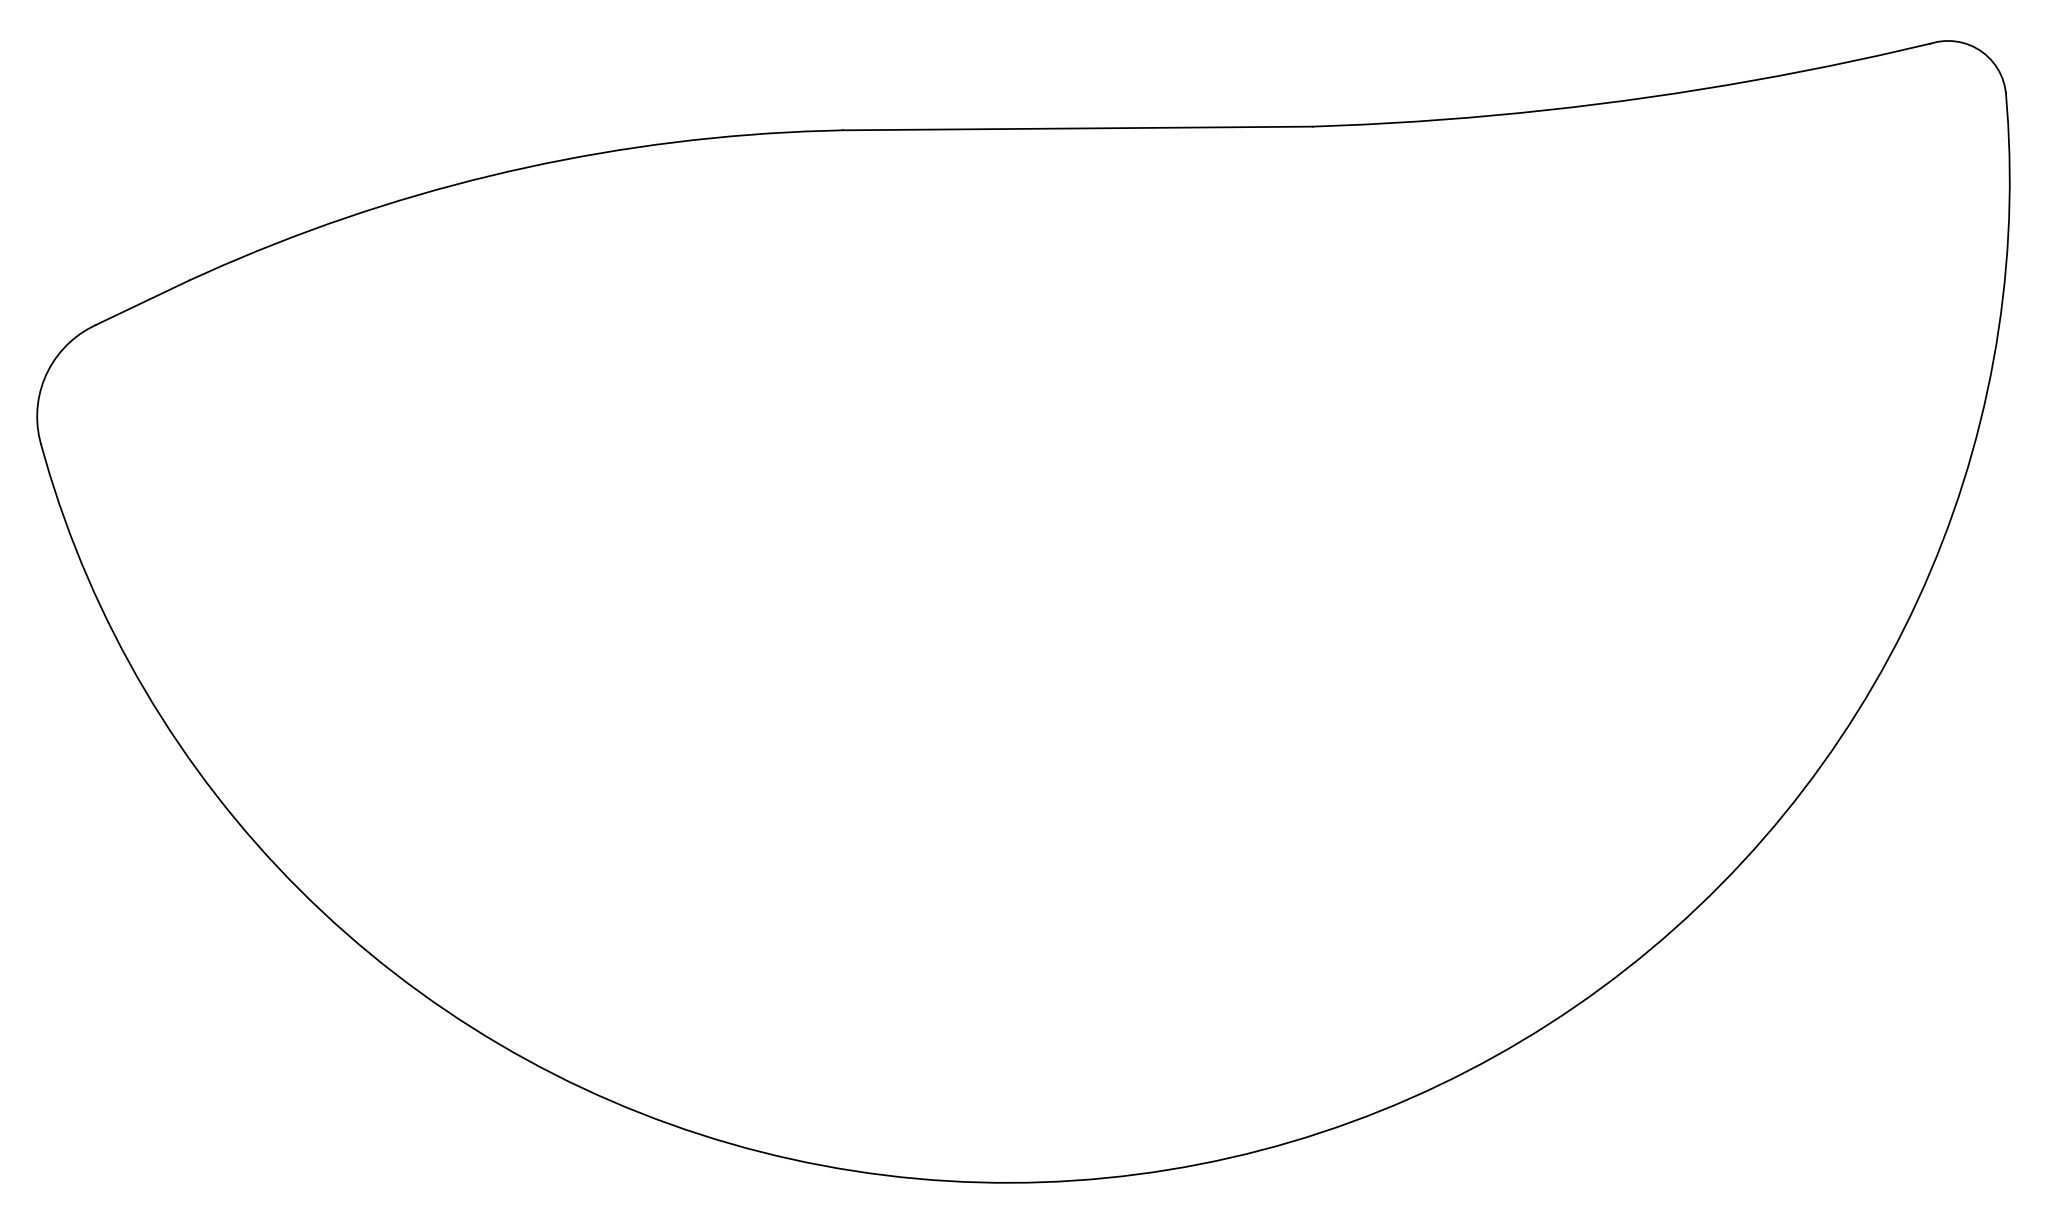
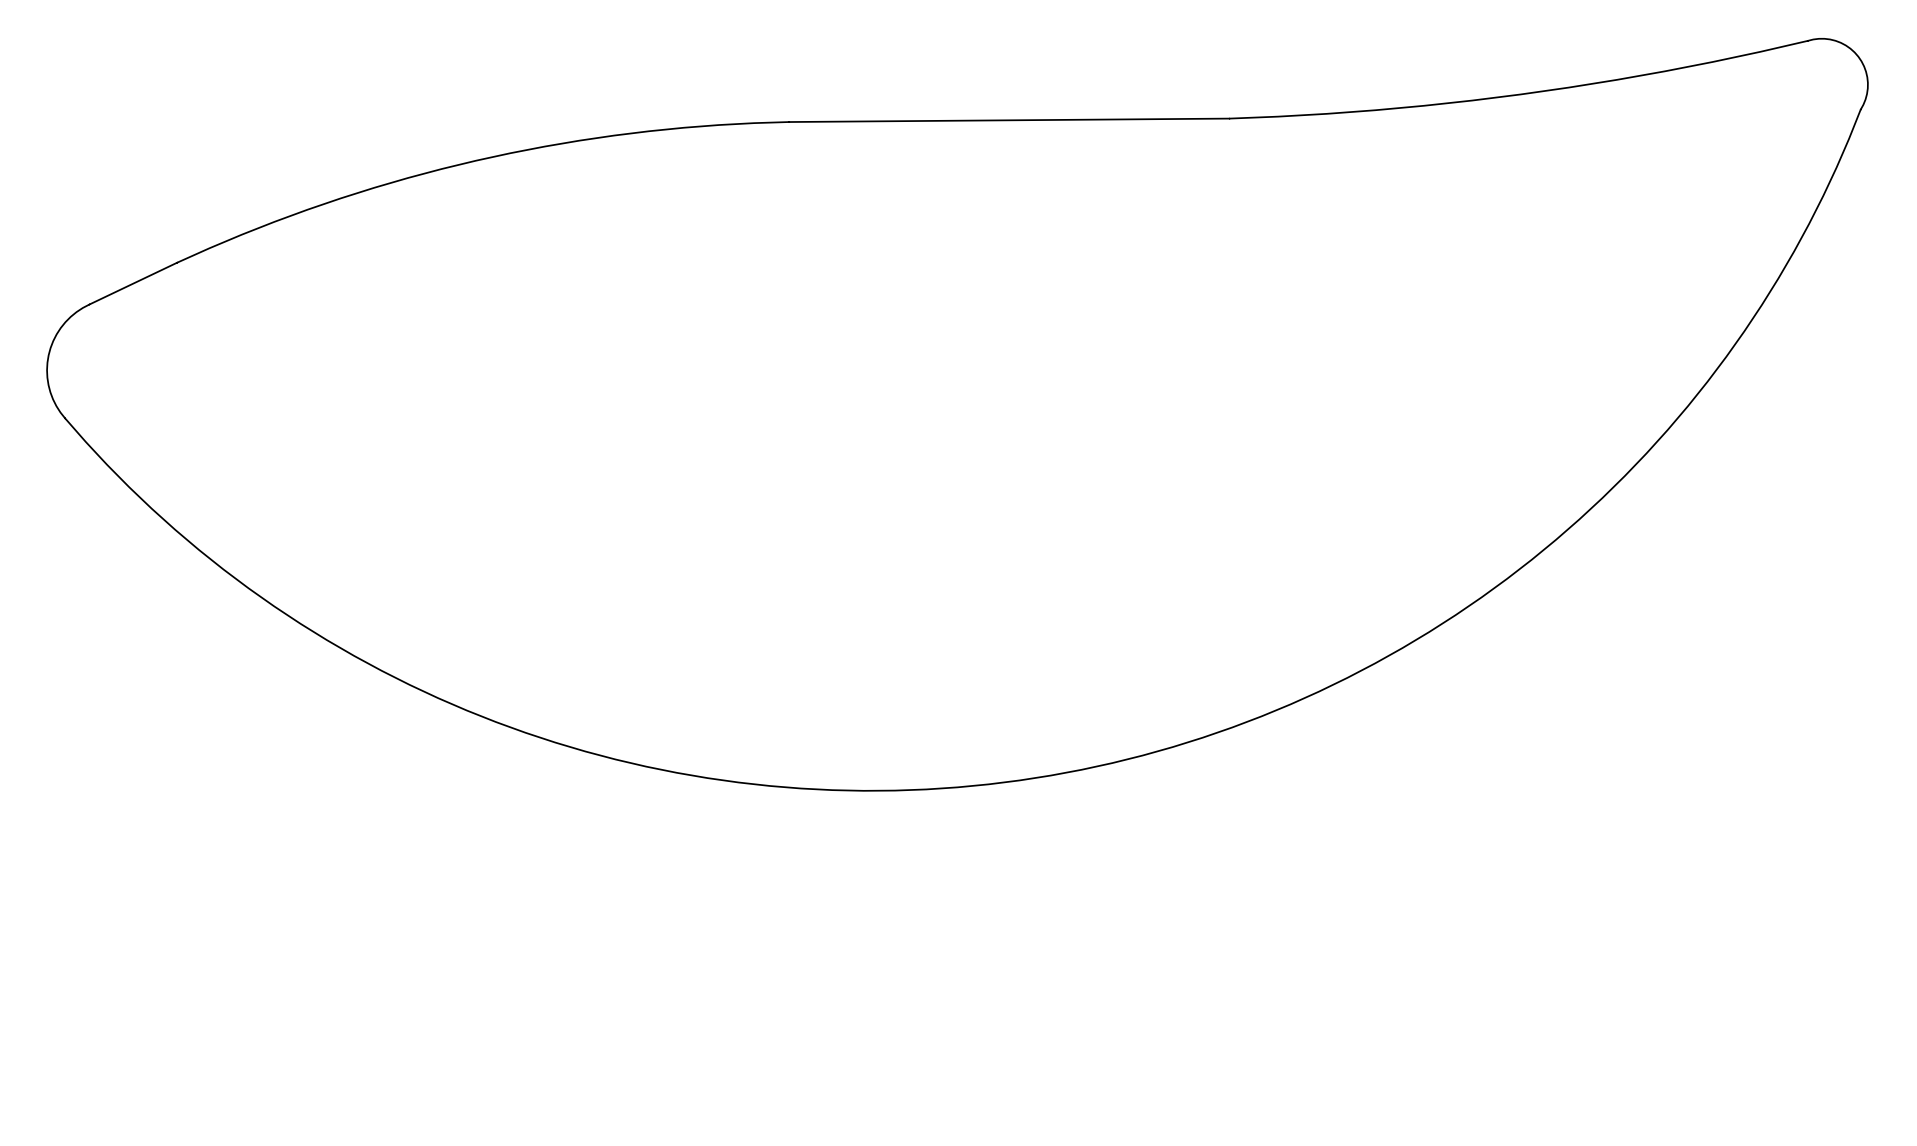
board edge: (1930, 43) (1944, 40) (1959, 42) (1979, 50) (1995, 65) (2004, 85) (2008, 124) (2009, 187) (2007, 250) (2001, 313) (1984, 406) (1967, 467) (1947, 527) (1924, 586) (1896, 642) (1866, 698) (1831, 751) (1774, 826) (1709, 895) (1639, 959) (1588, 997) (1536, 1032) (1453, 1078) (1395, 1104) (1336, 1127) (1246, 1154) (1153, 1172) (1058, 1181) (995, 1182) (932, 1180) (838, 1168) (745, 1148) (685, 1129) (626, 1107) (540, 1067) (458, 1019) (382, 963) (334, 922) (288, 878) (226, 807) (188, 757) (153, 704) (122, 649) (94, 592) (59, 504) (40, 444) (37, 417) (40, 391) (46, 374) (55, 359) (73, 339) (95, 325) -> (1807, 40) (1824, 38) (1845, 45) (1858, 56) (1867, 77) (1865, 99) (1836, 167) (1794, 251) (1744, 331) (1687, 406) (1646, 453) (1602, 497) (1531, 559) (1455, 615) (1402, 648) (1319, 691) (1232, 727) (1172, 747) (1112, 763) (1019, 780) (926, 789) (832, 790) (769, 785) (676, 772) (615, 759) (525, 732) (438, 698) (381, 670) (300, 623) (248, 588) (199, 549) (129, 487) (65, 418) (56, 406) (48, 385) (47, 370) (48, 355) (56, 334) (65, 322) (76, 312) (89, 304)

